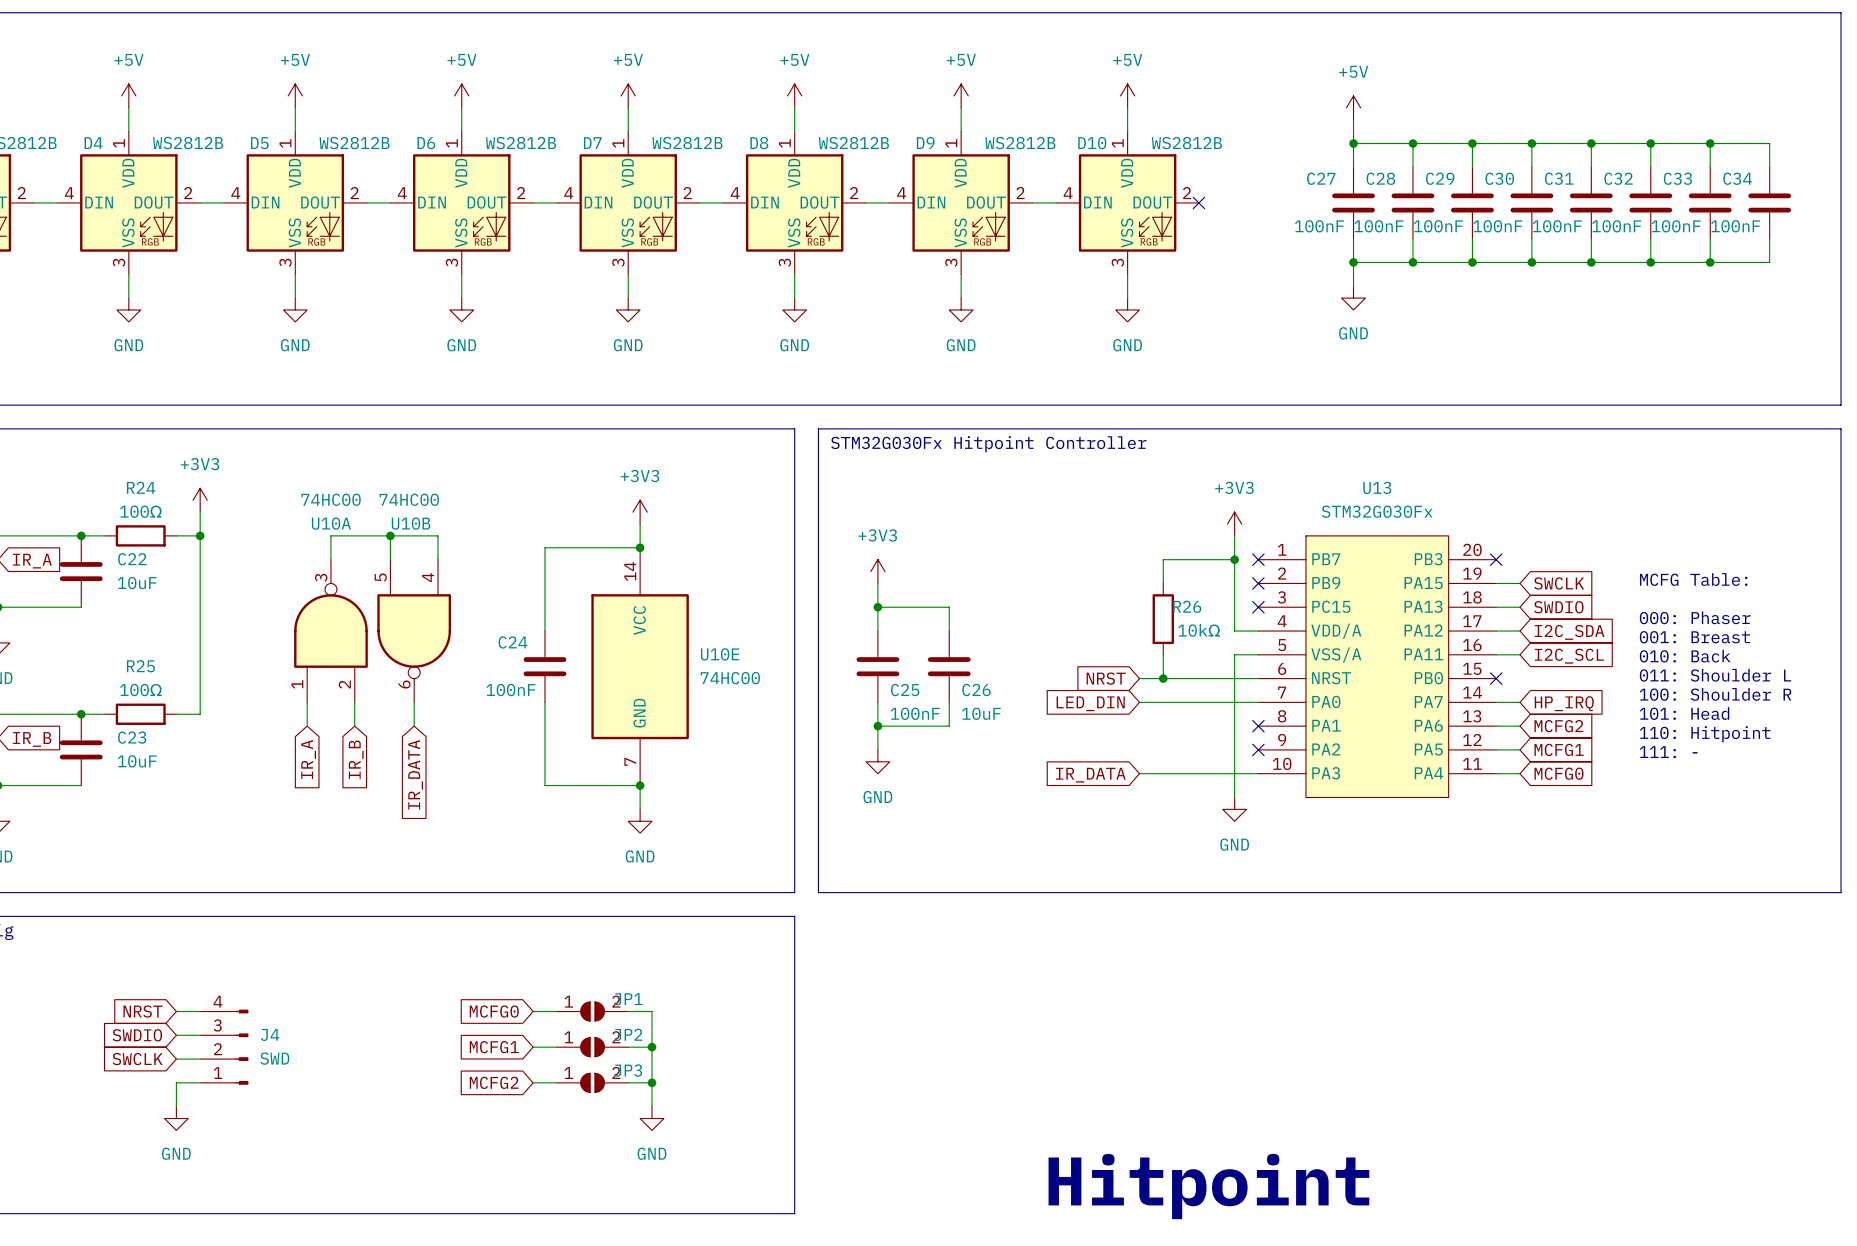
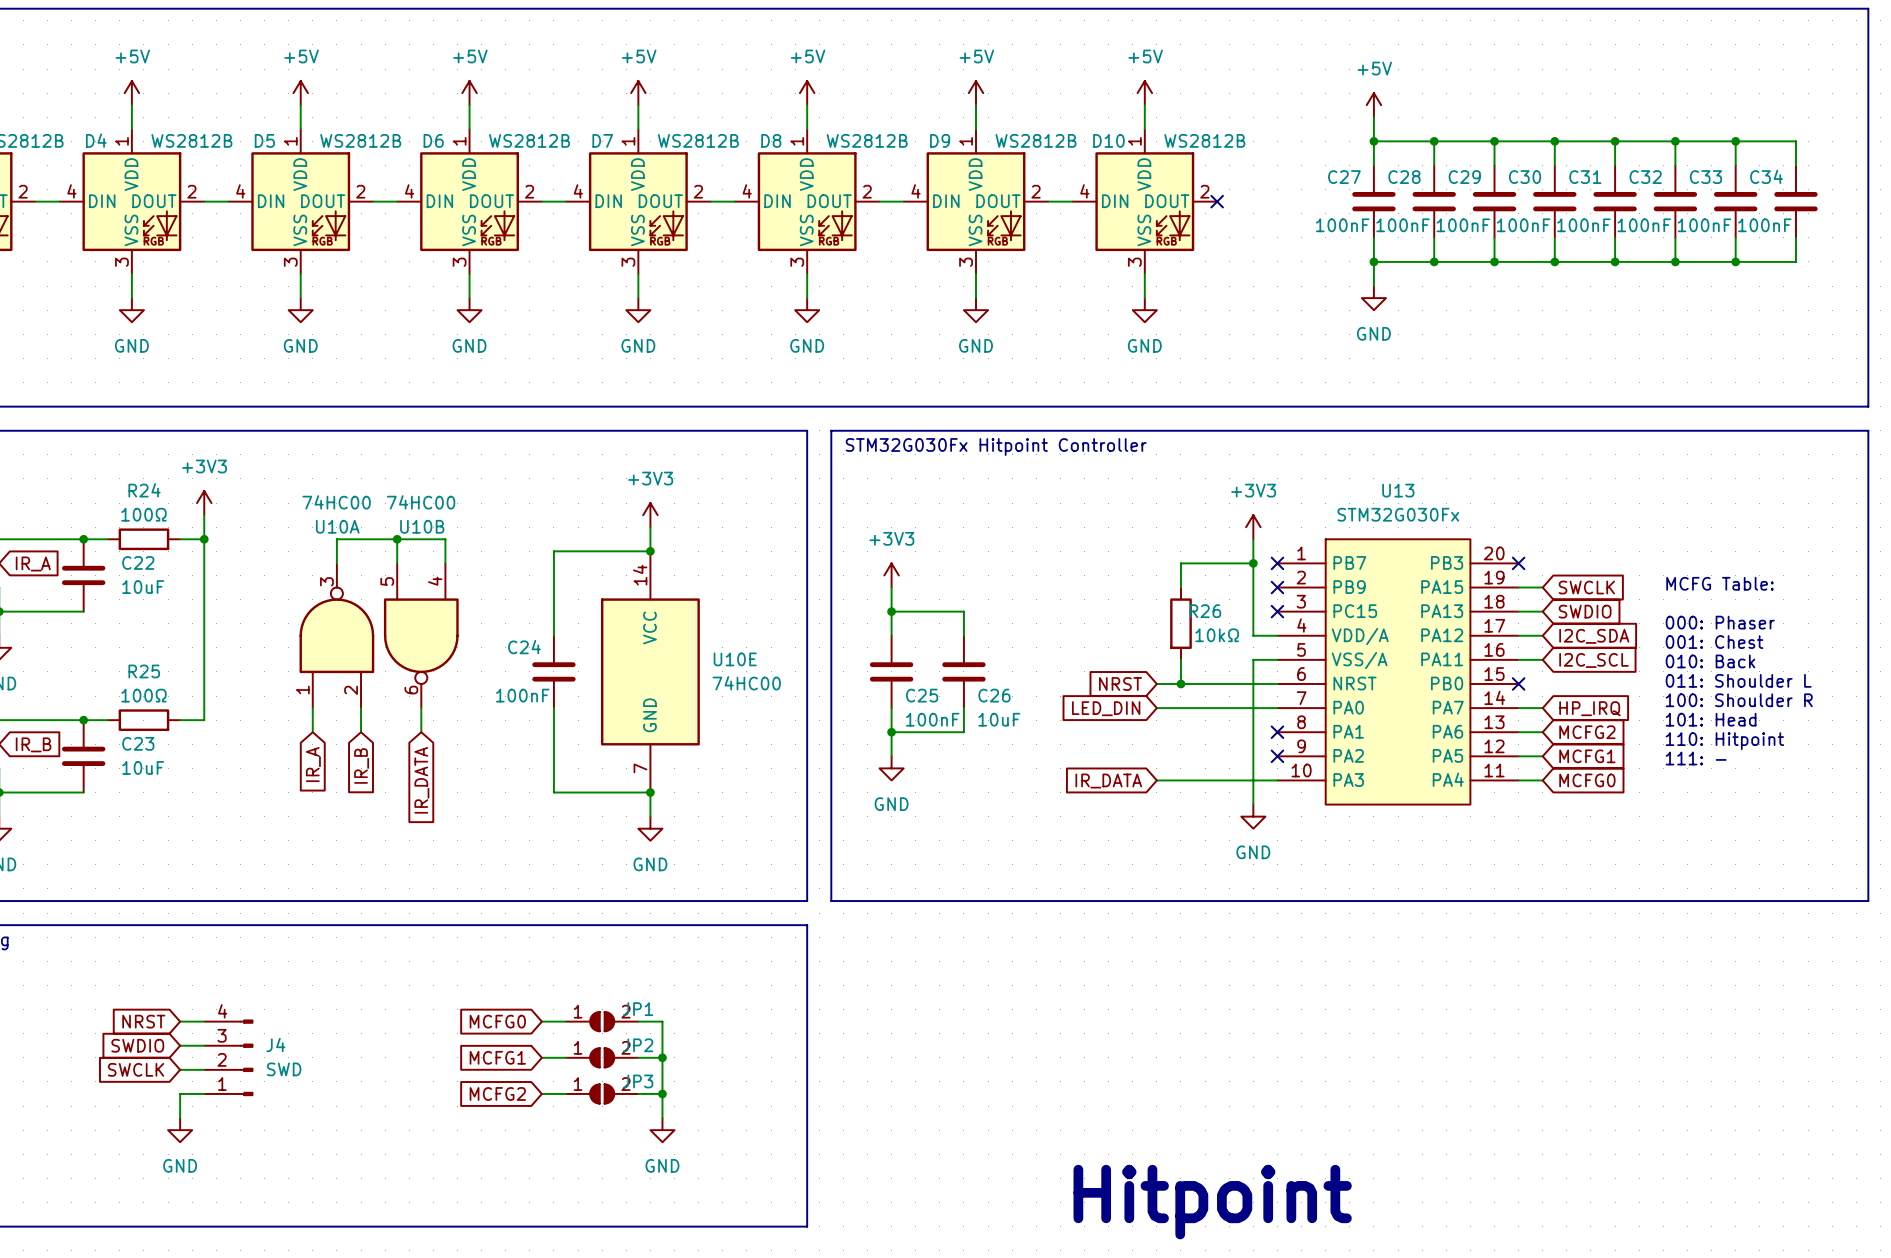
text: 001: Breast (1694, 637) -> 001: Chest (1714, 642)

